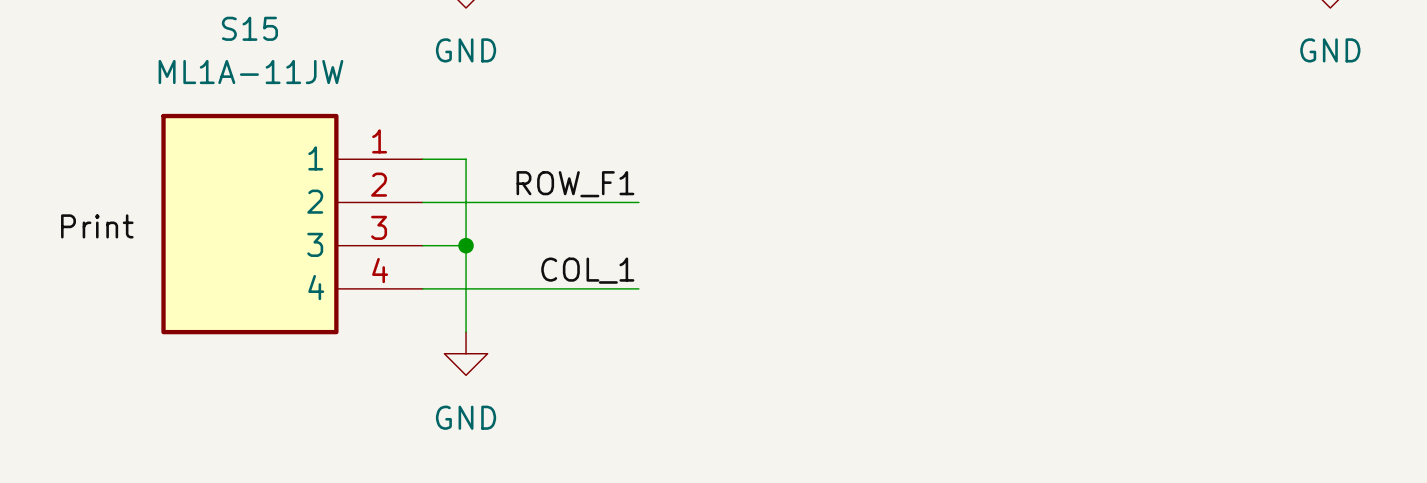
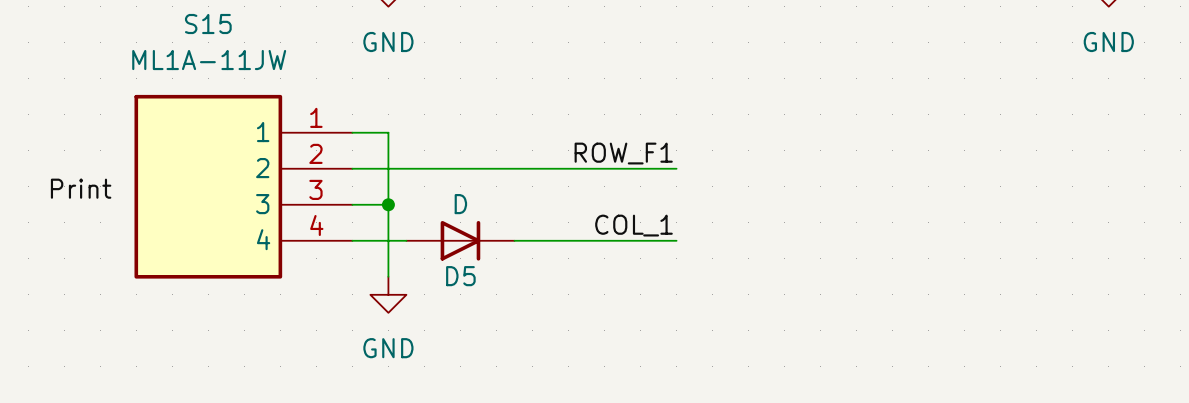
label position: ROW_F1 (575, 184) -> ROW_F1 (623, 153)
wire: none -> (532, 168) (676, 168)
label position: COL_1 (587, 270) -> COL_1 (633, 225)
D5: none -> D (460, 240)
wire: none -> (532, 240) (676, 240)

